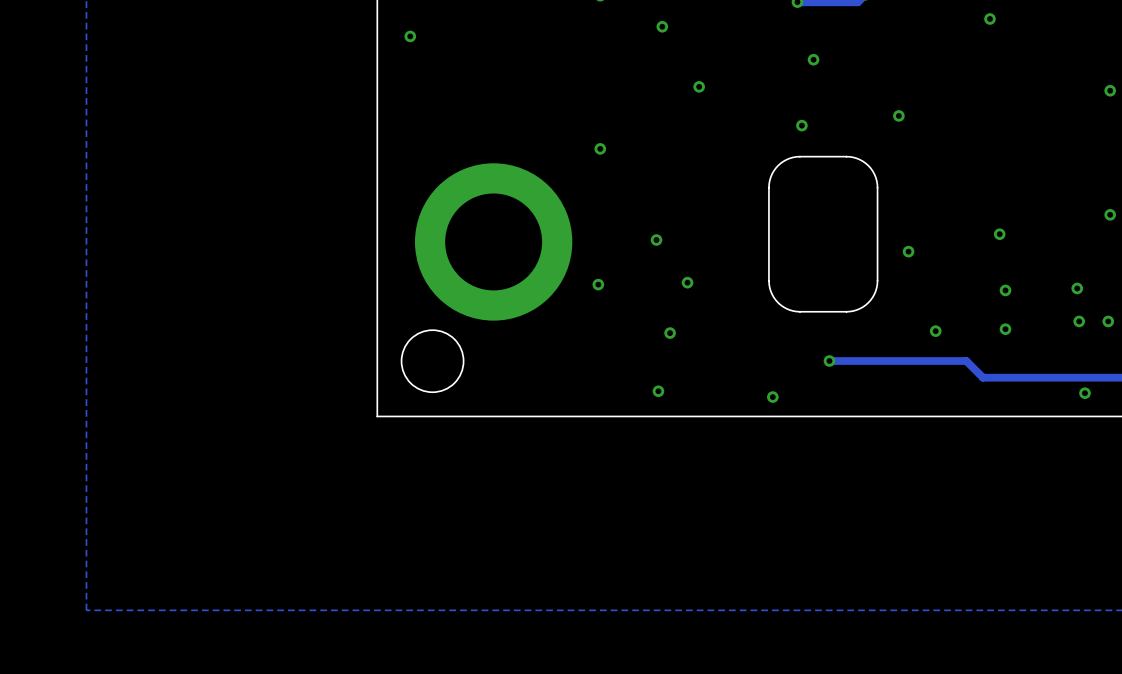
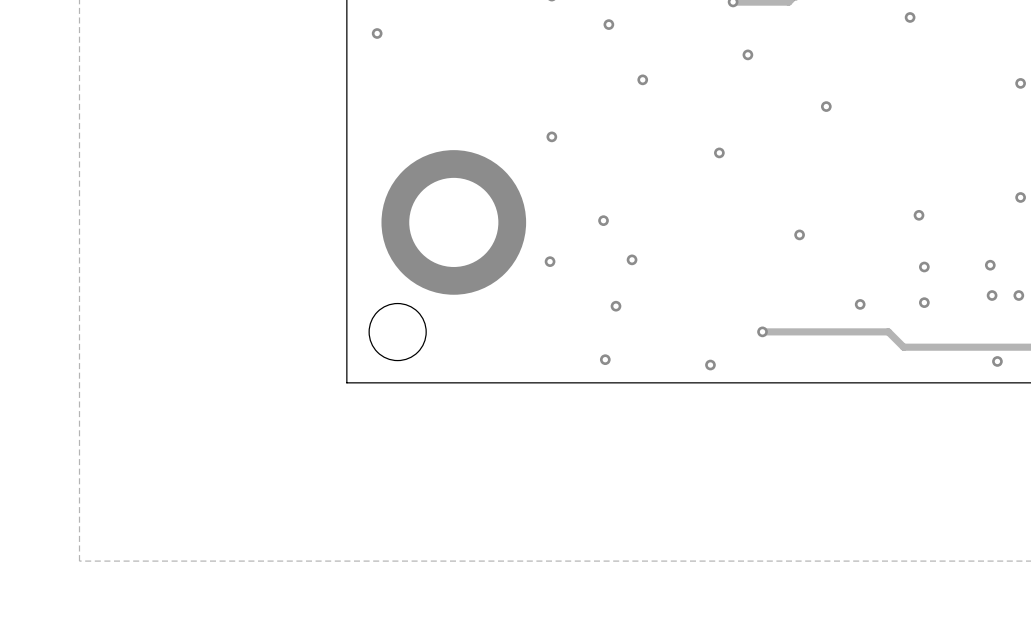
via position: (801, 125) -> (719, 152)
board edge: (846, 156) (793, 157) (780, 163) (770, 177) (768, 187) (769, 284) (775, 300) (789, 310) (799, 311) (853, 310) (868, 302) (875, 290) (877, 280) (876, 180) (872, 171) (865, 163) (856, 158) (846, 156) -> none
via position: (908, 251) -> (799, 234)

